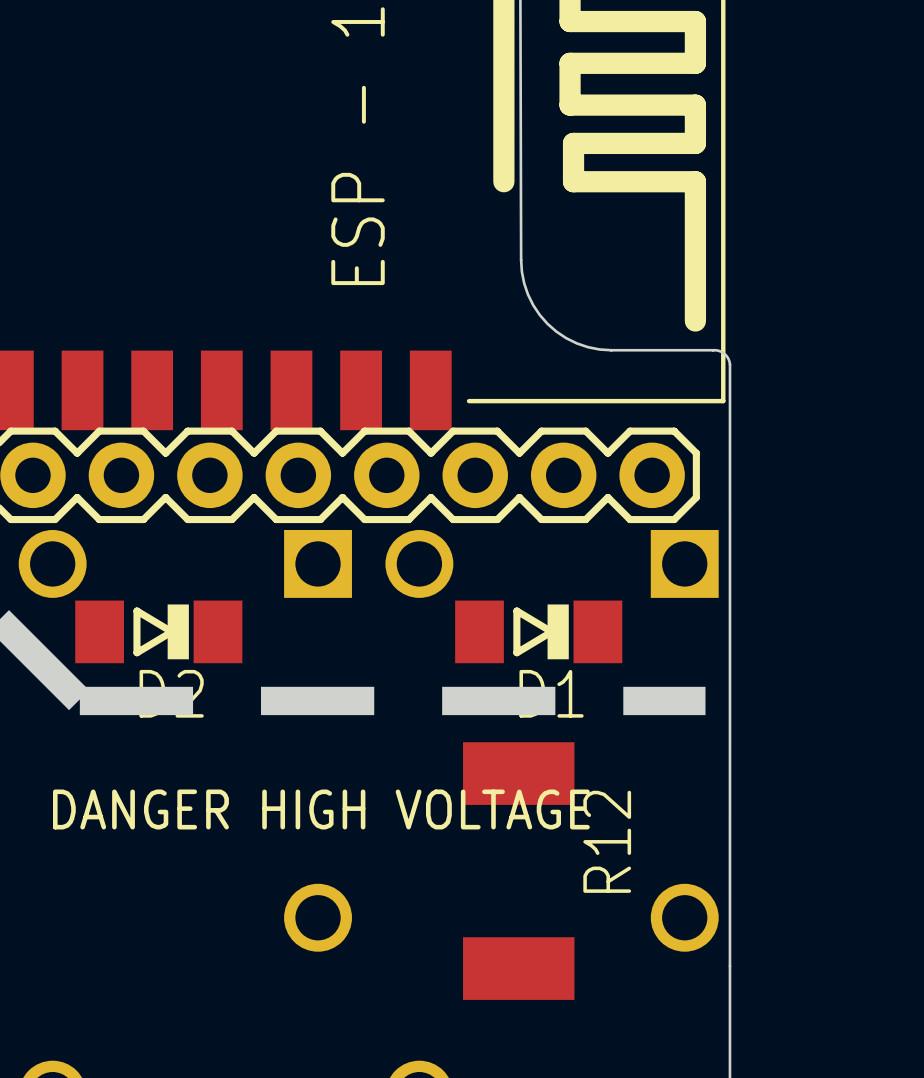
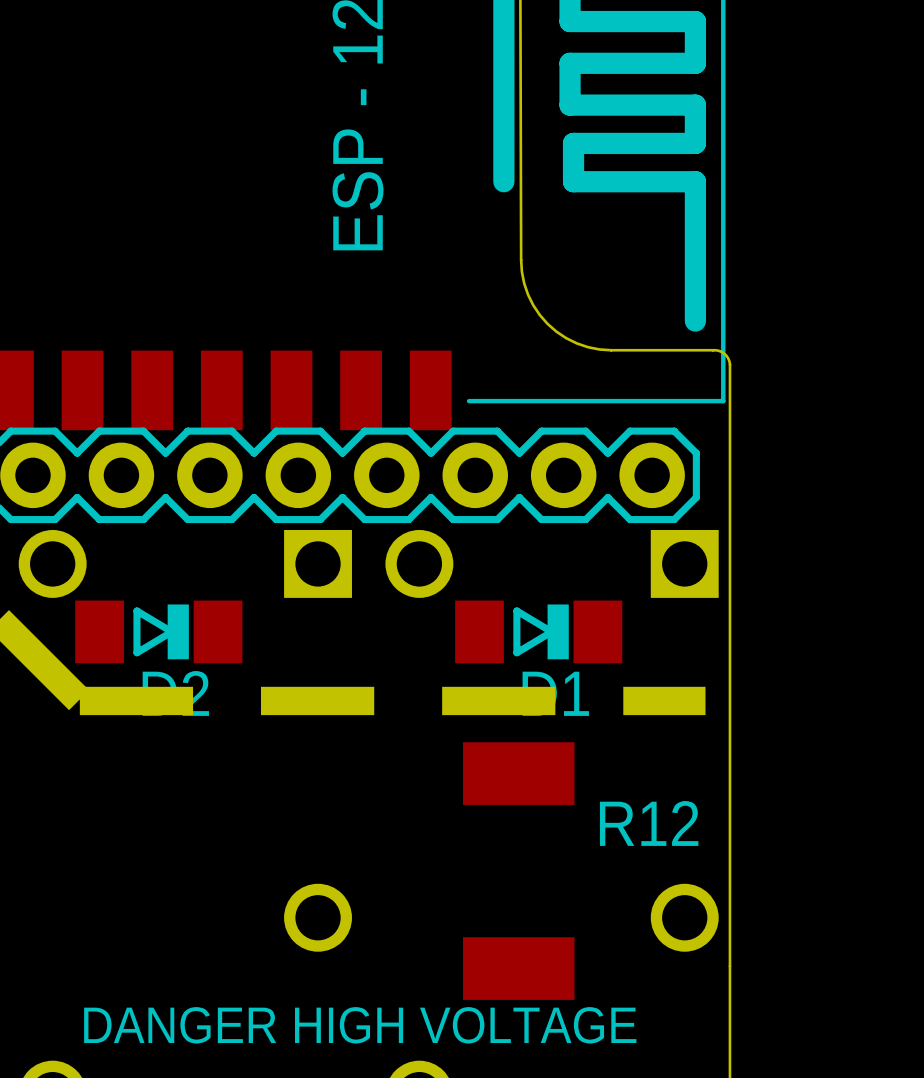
text position: DANGER HIGH VOLTAGE (321, 809) -> DANGER HIGH VOLTAGE (360, 1025)
R12 name rotation: 0° (607, 841) -> 90° clockwise (649, 823)

